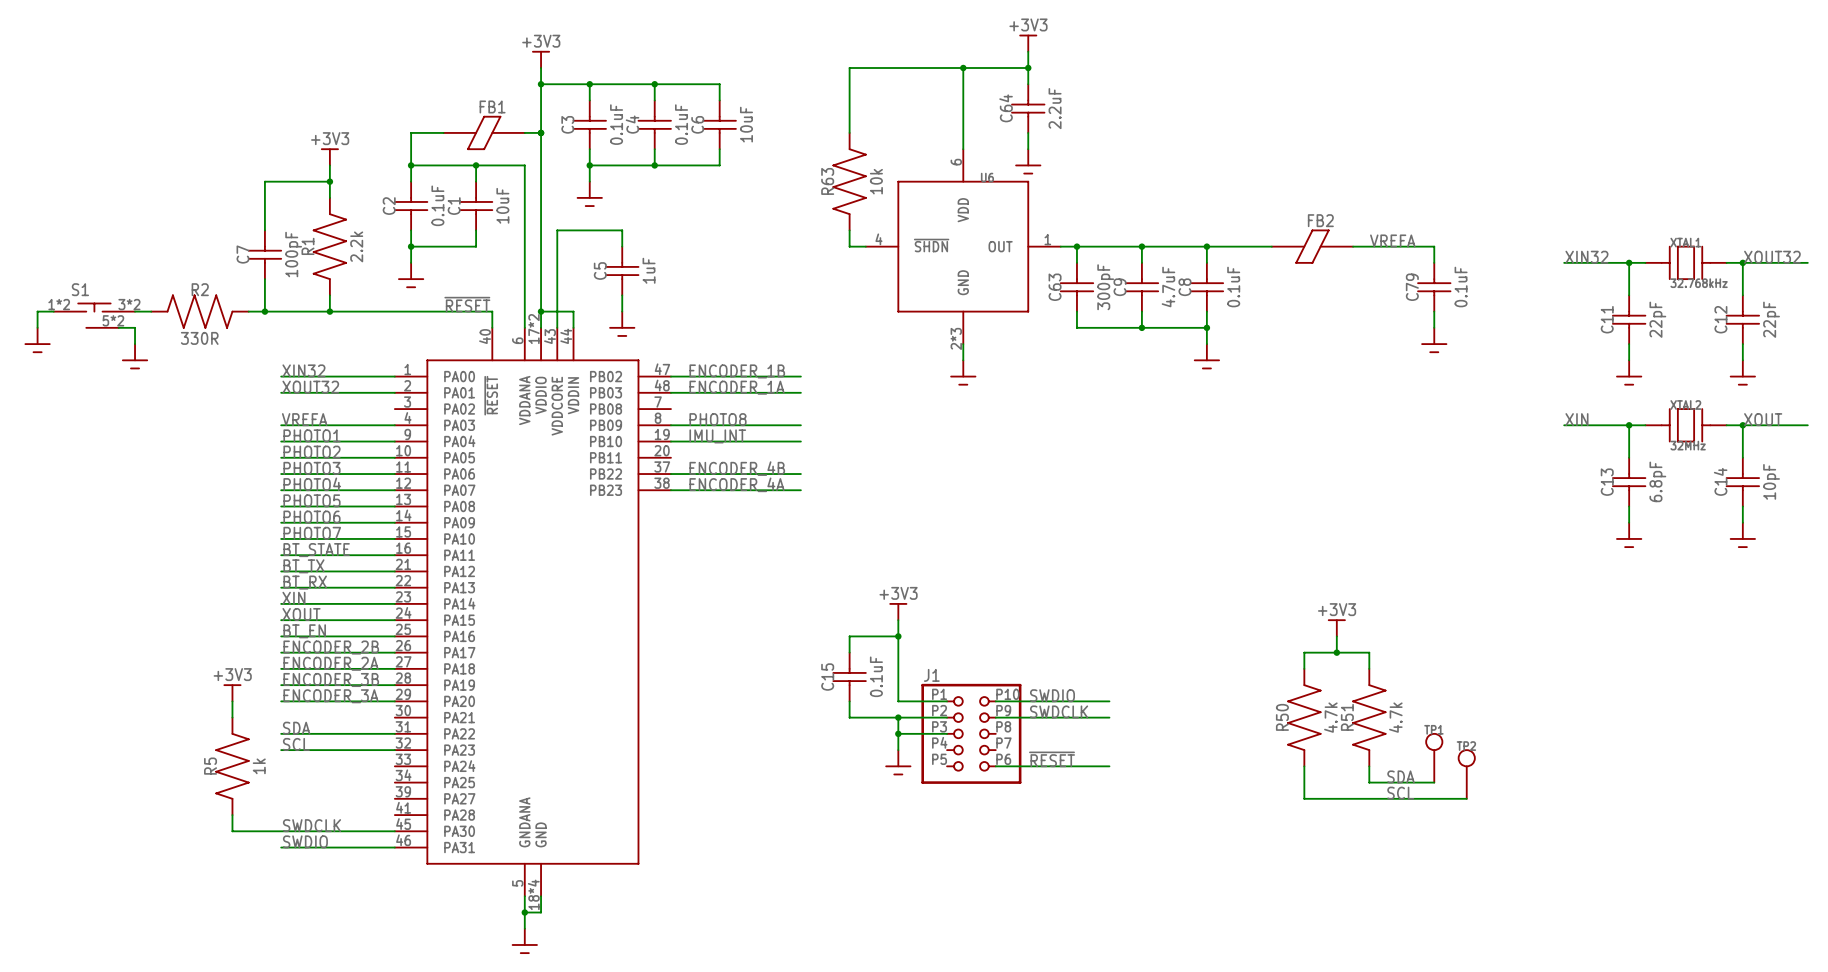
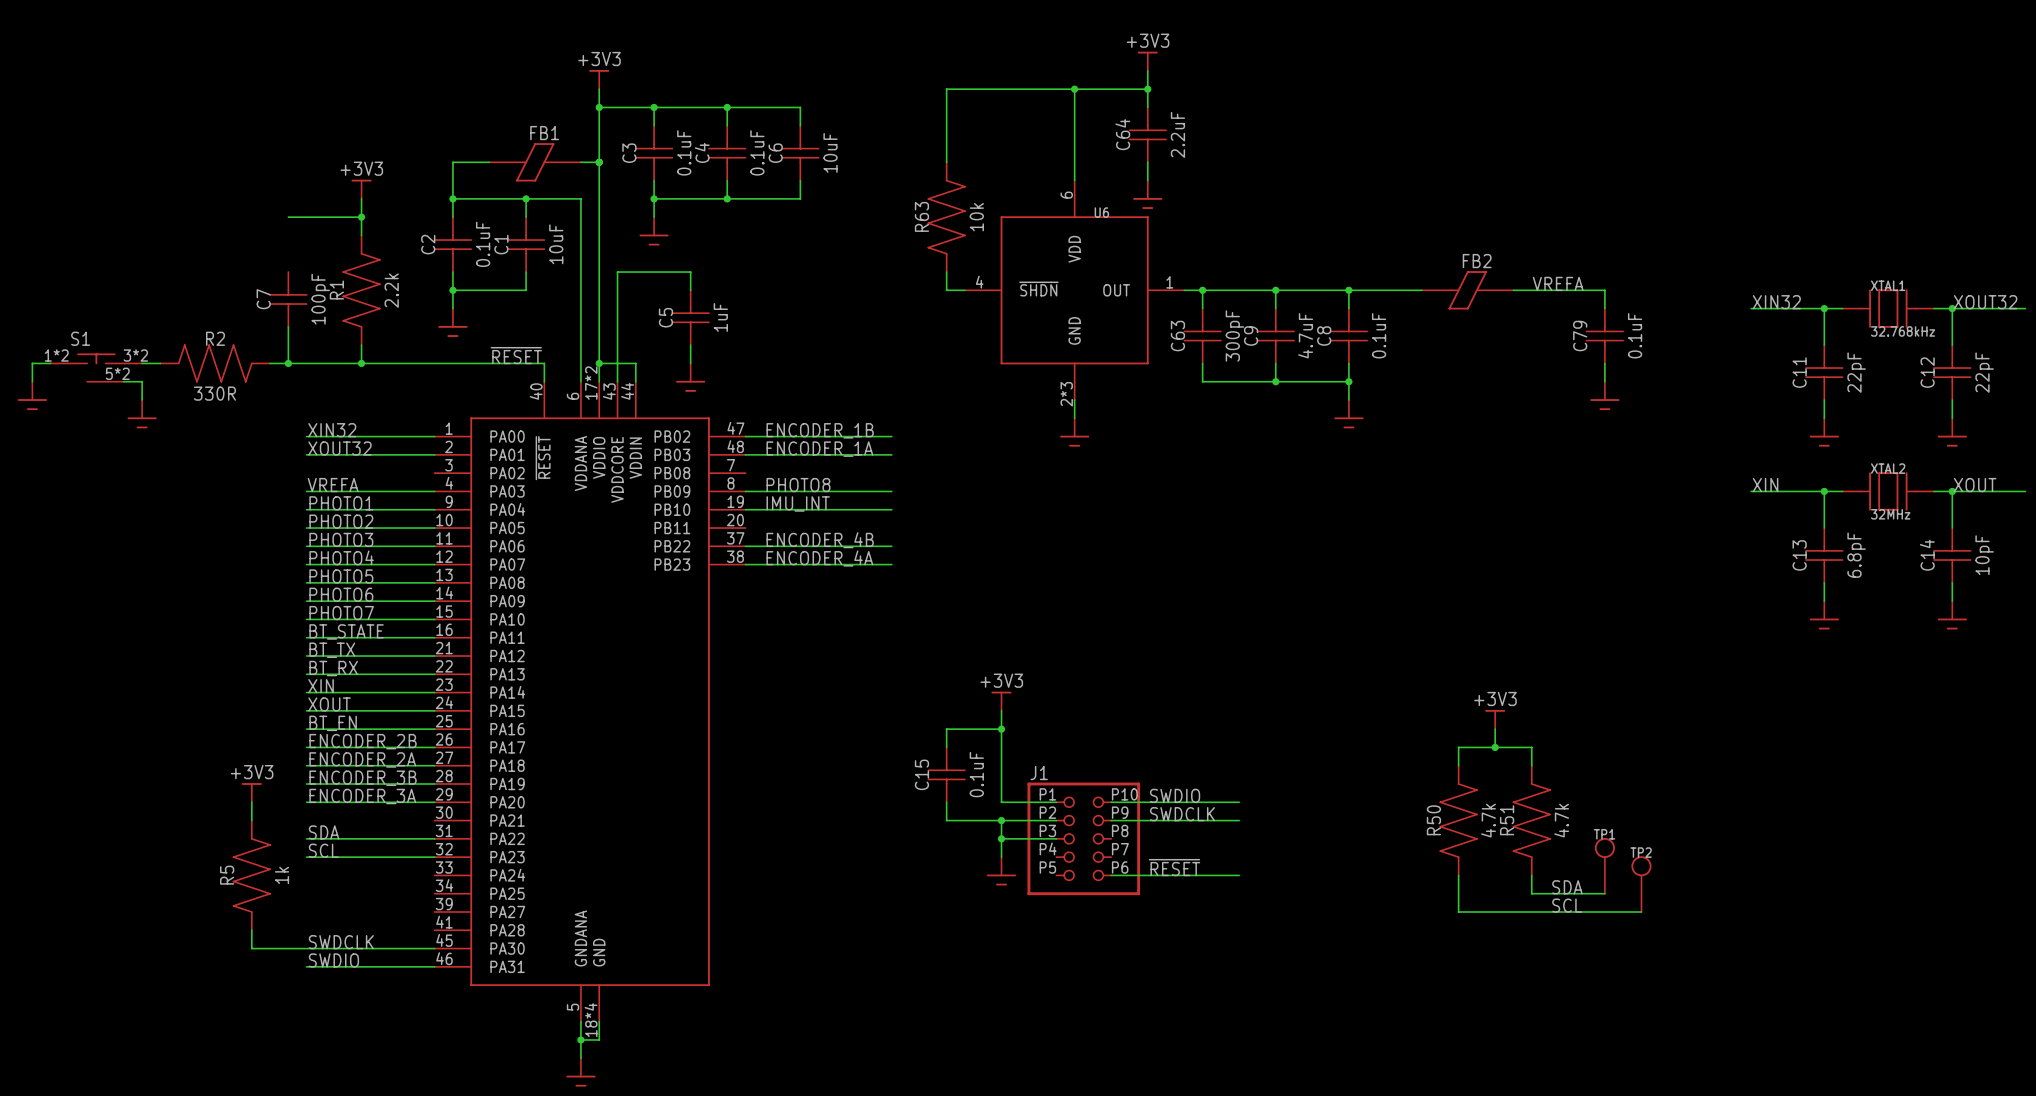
wire: (264, 181) (264, 230) -> none

